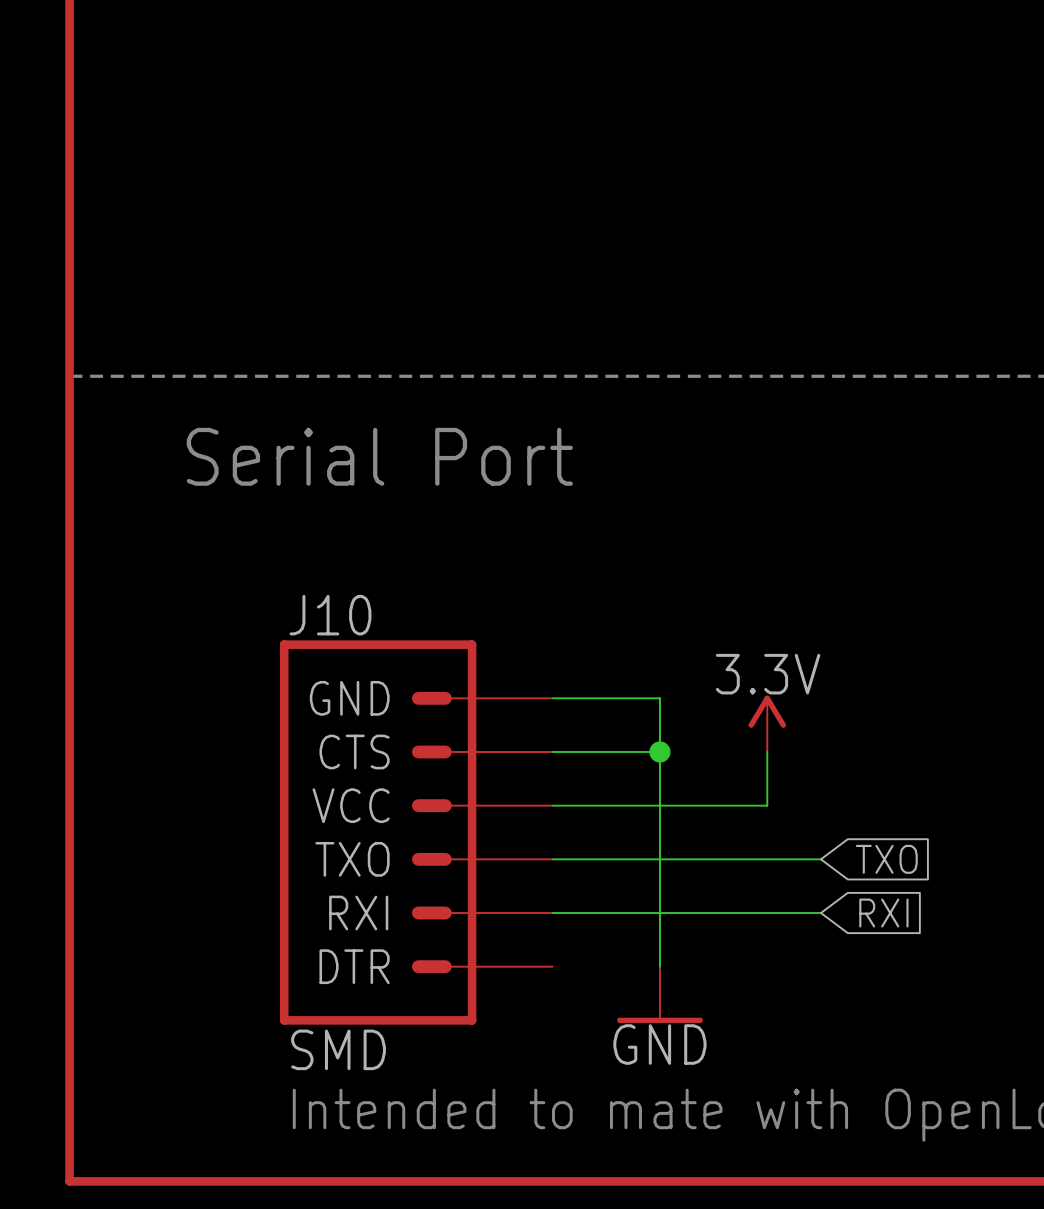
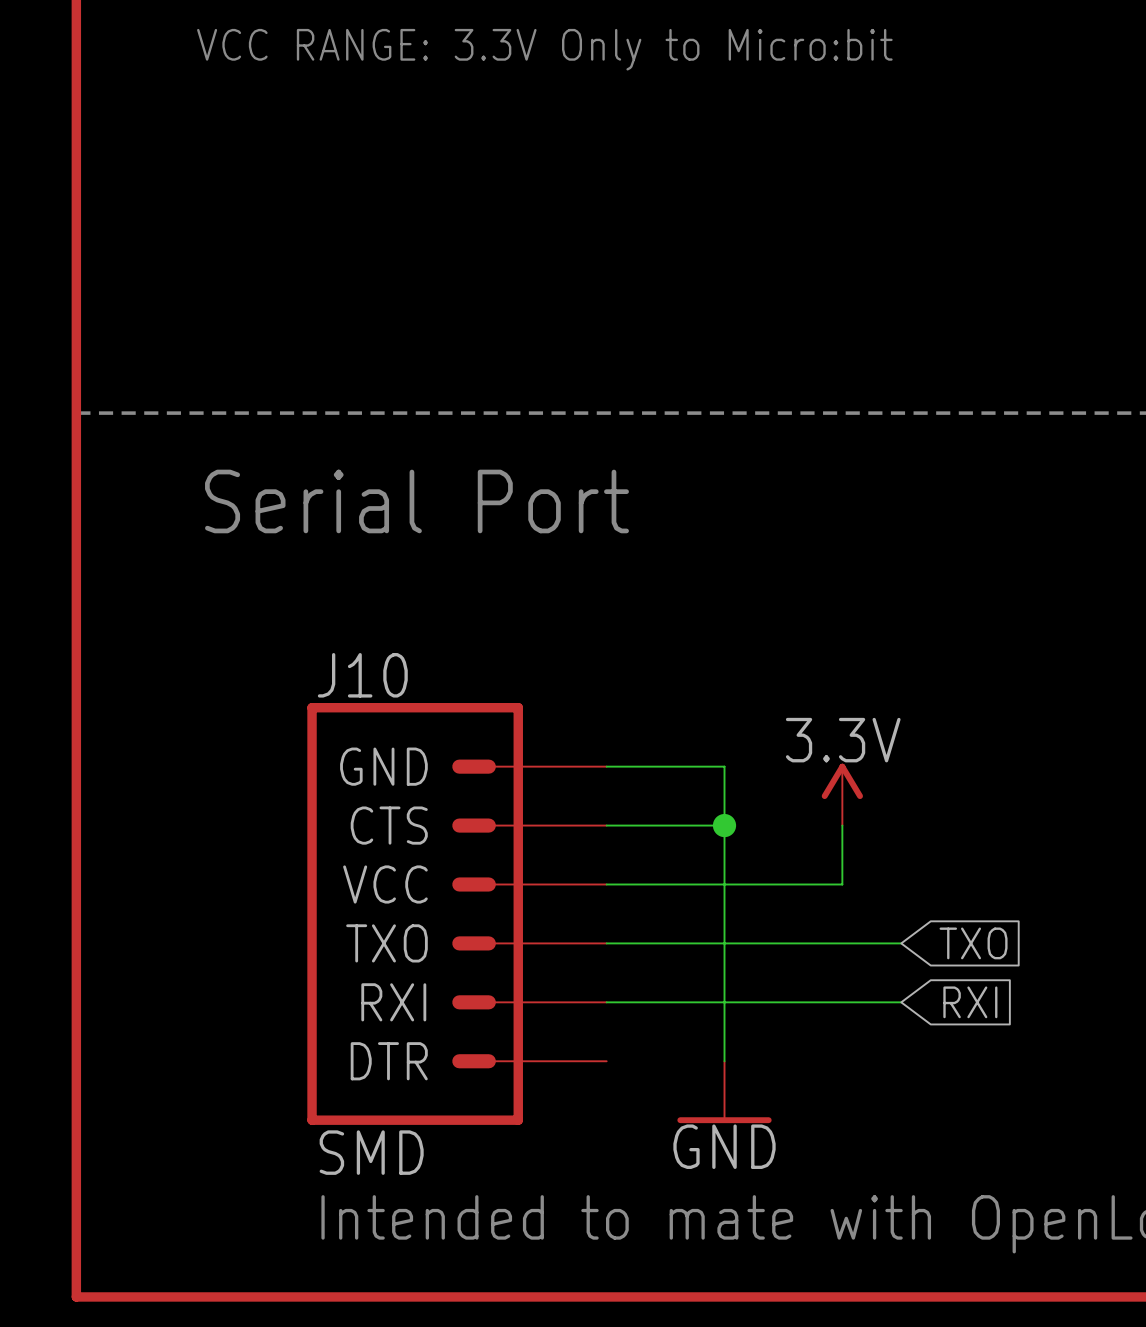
text: none -> VCC RANGE: 3.3V Only to Micro:bit (544, 49)

